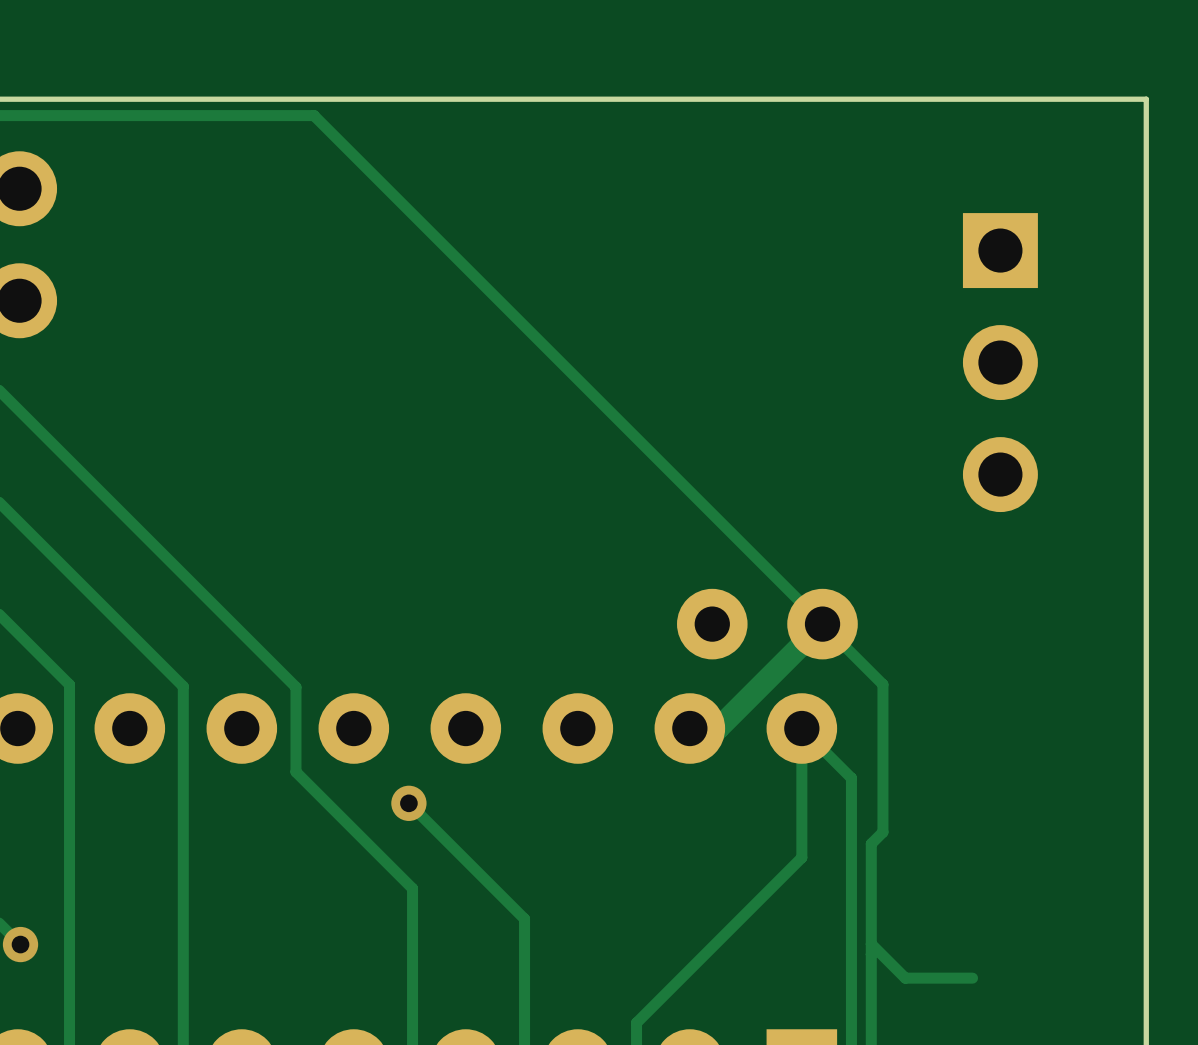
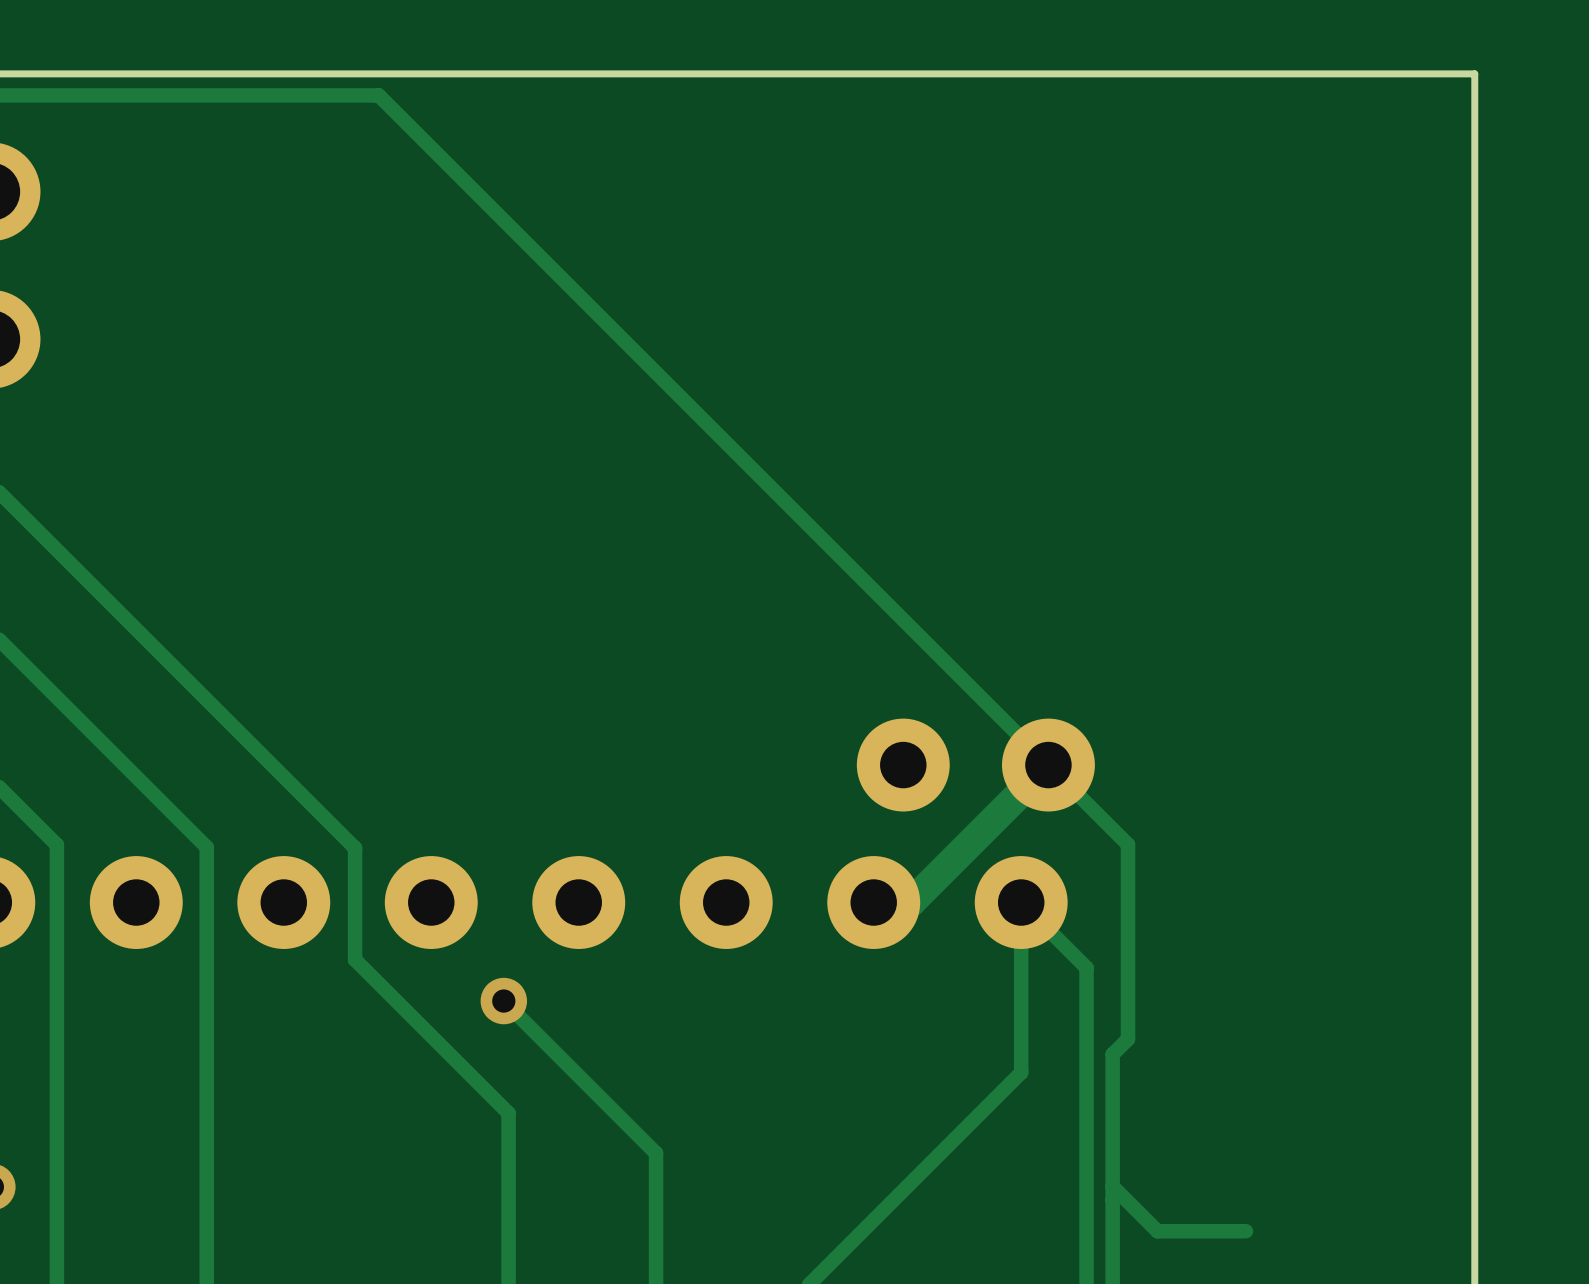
part: (1000, 362) -> none

